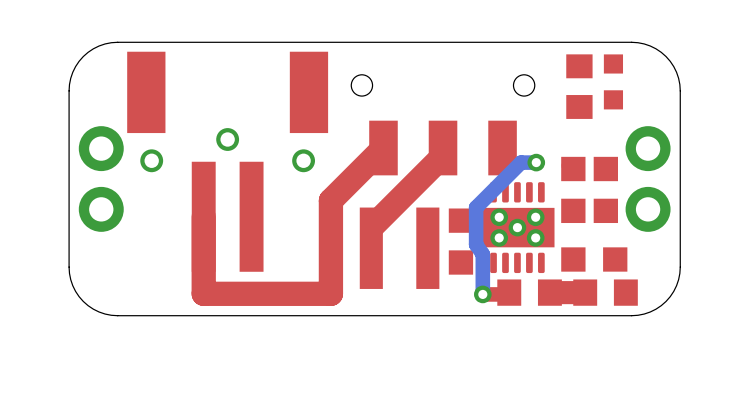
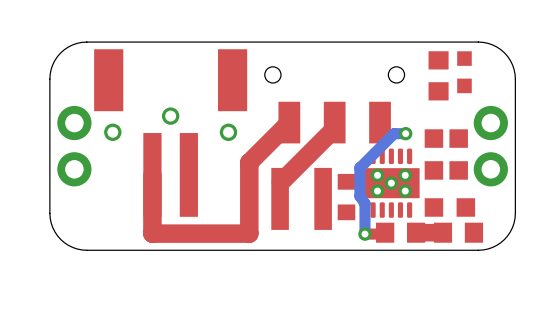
part footprint: [448, 208, 474, 275] -> [337, 173, 356, 221]

